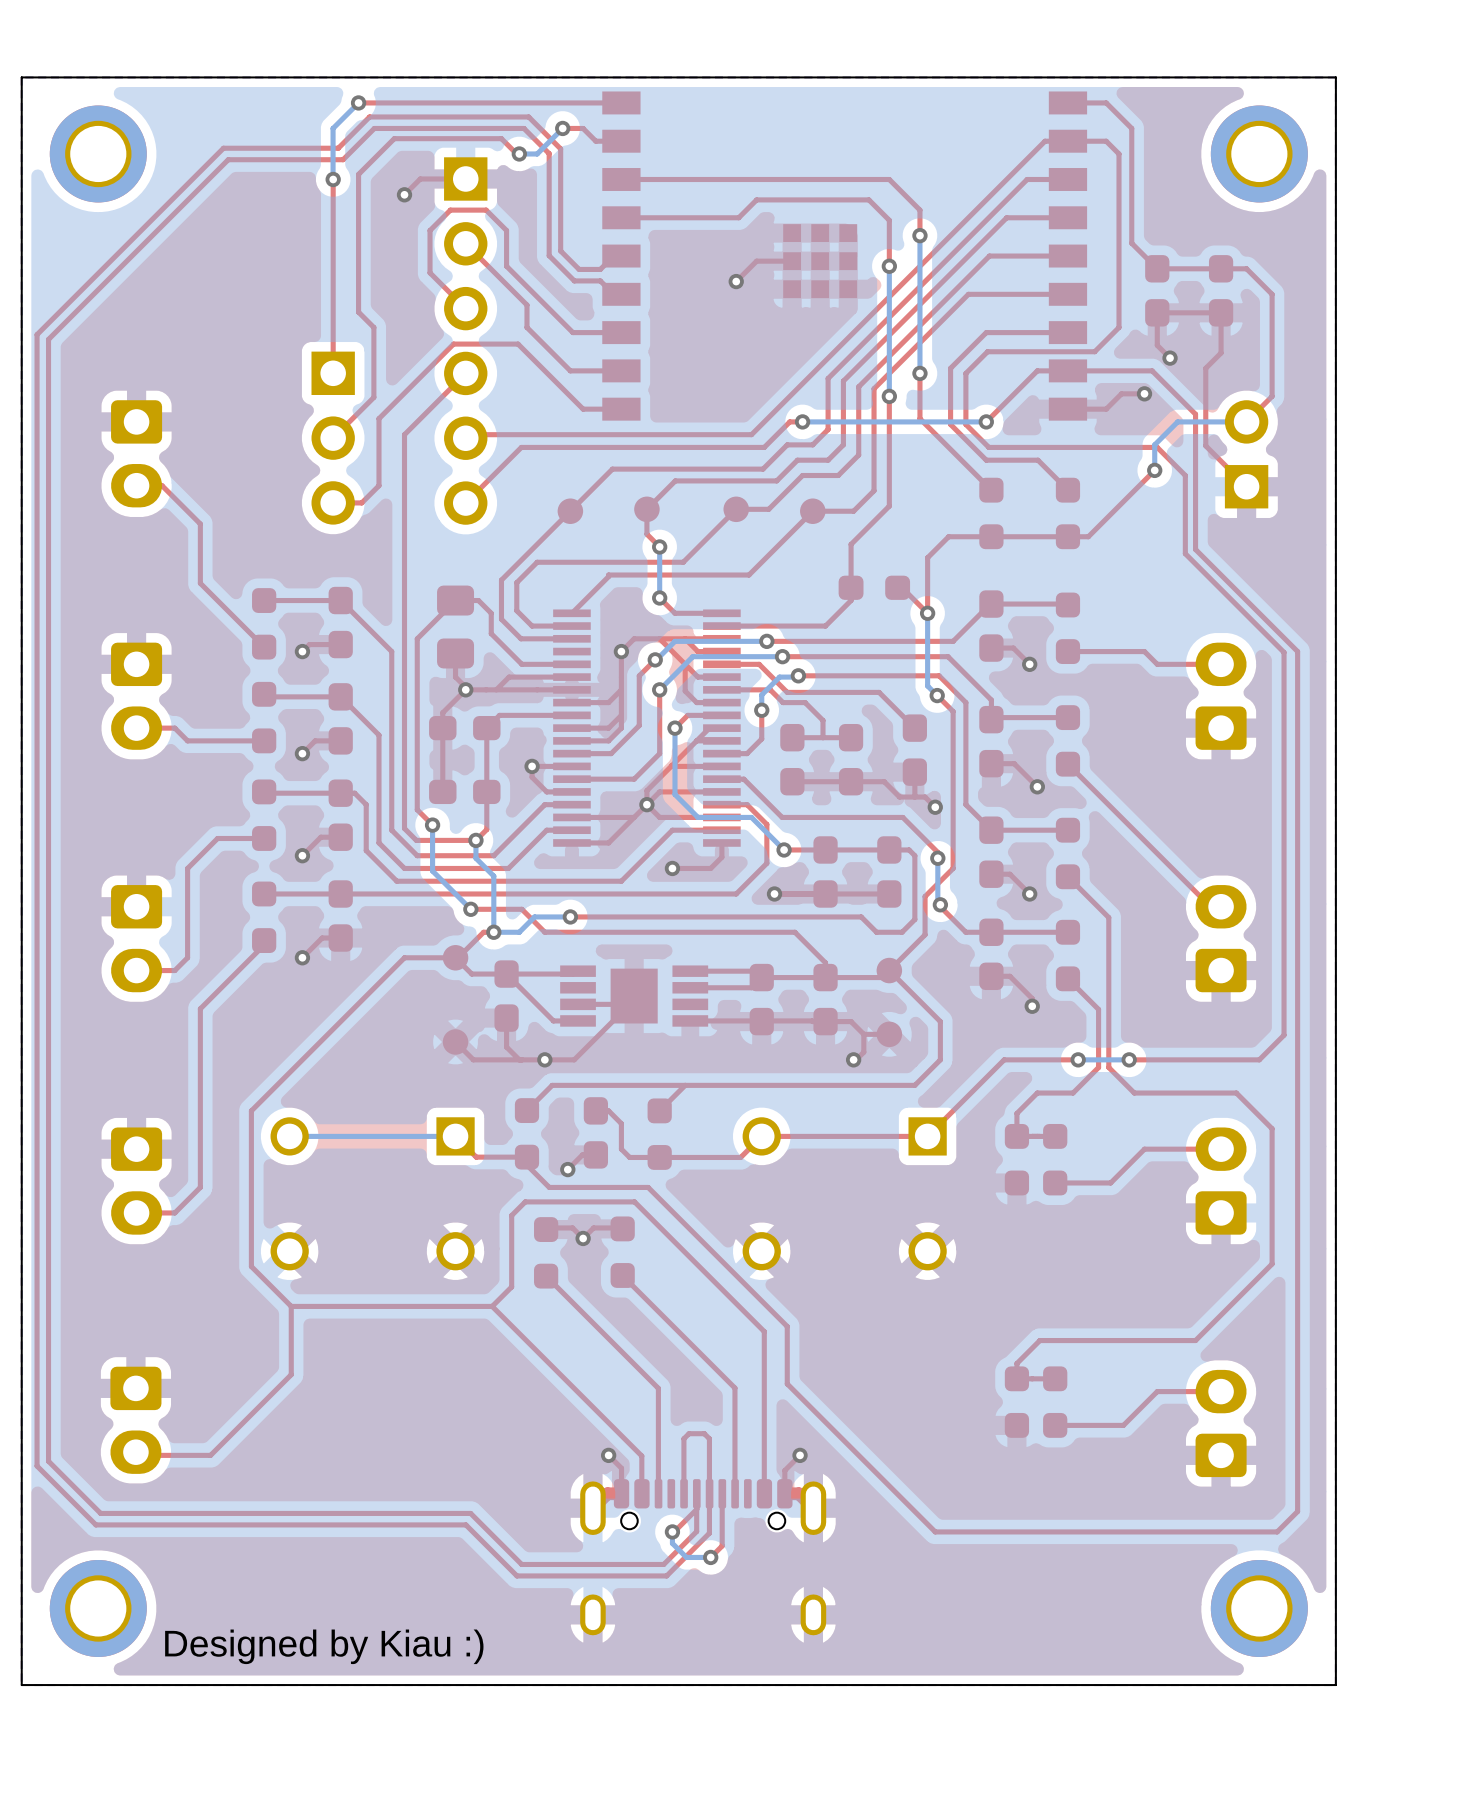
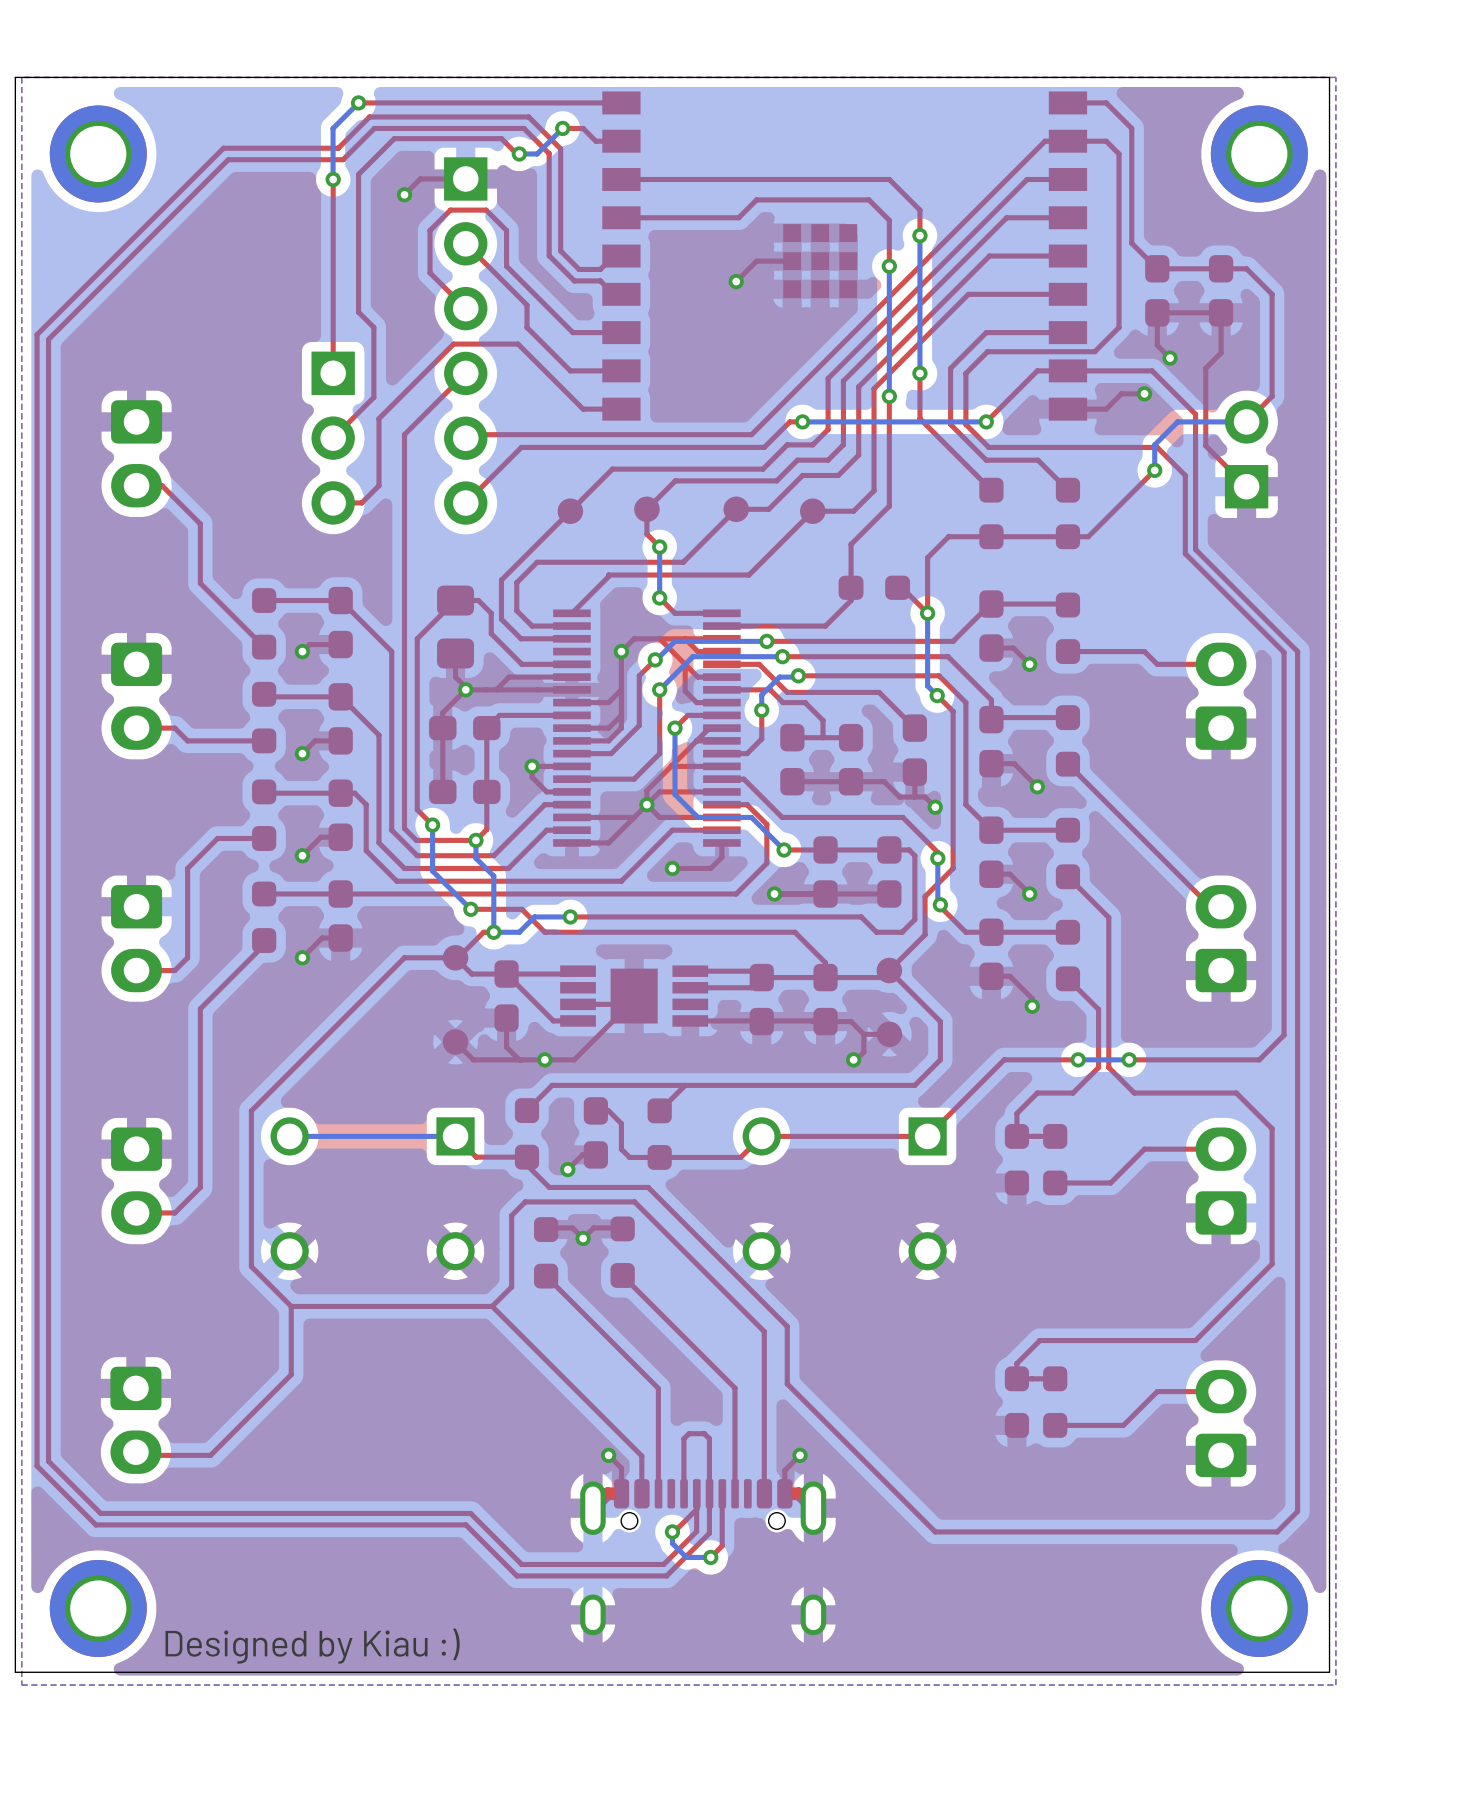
board edge: (1329, 77) (1335, 77) (1335, 1685) (21, 1685) (21, 77) -> (1329, 77) (1329, 1672) (15, 1672) (15, 77) (21, 77)

